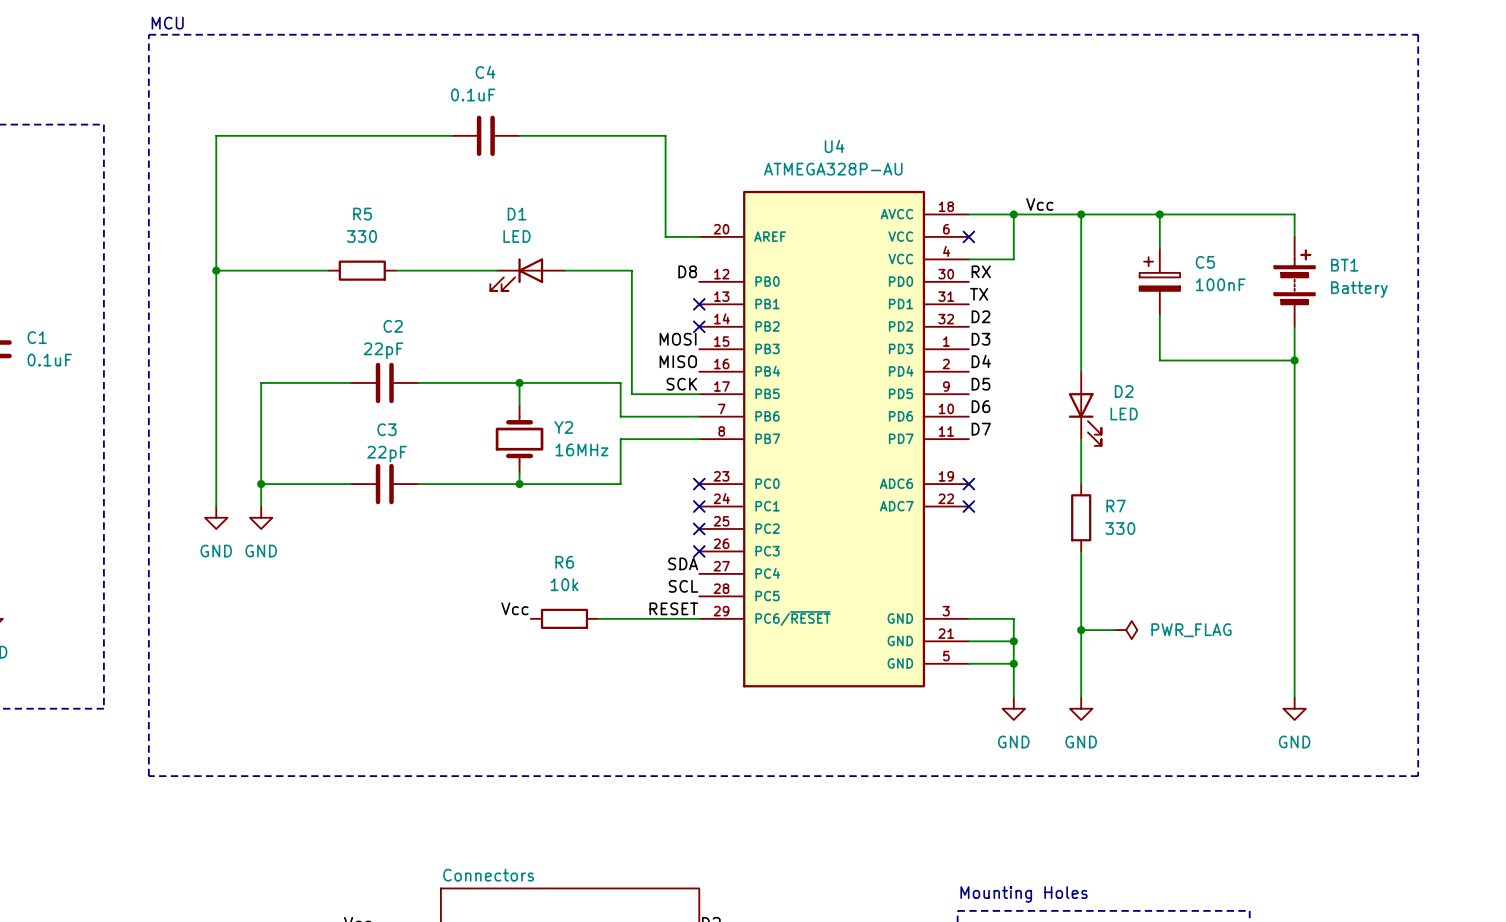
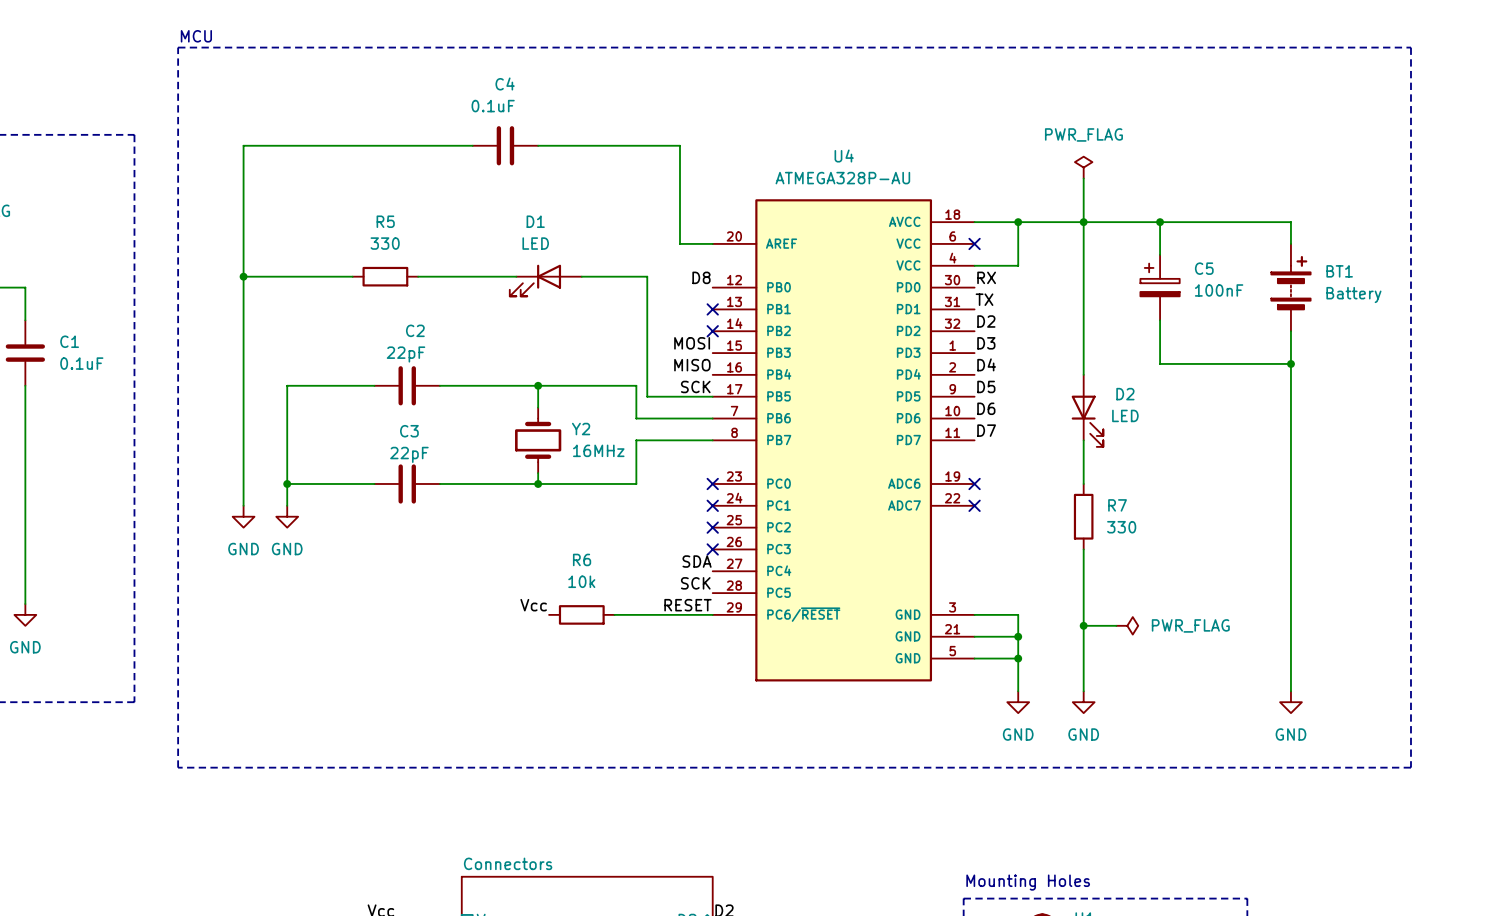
power symbol: none -> PWR_FLAG (1083, 167)
wire: none -> (1083, 178) (1083, 222)
label: Vcc (1039, 204) -> none
label: SCL (683, 586) -> SCK (695, 583)

